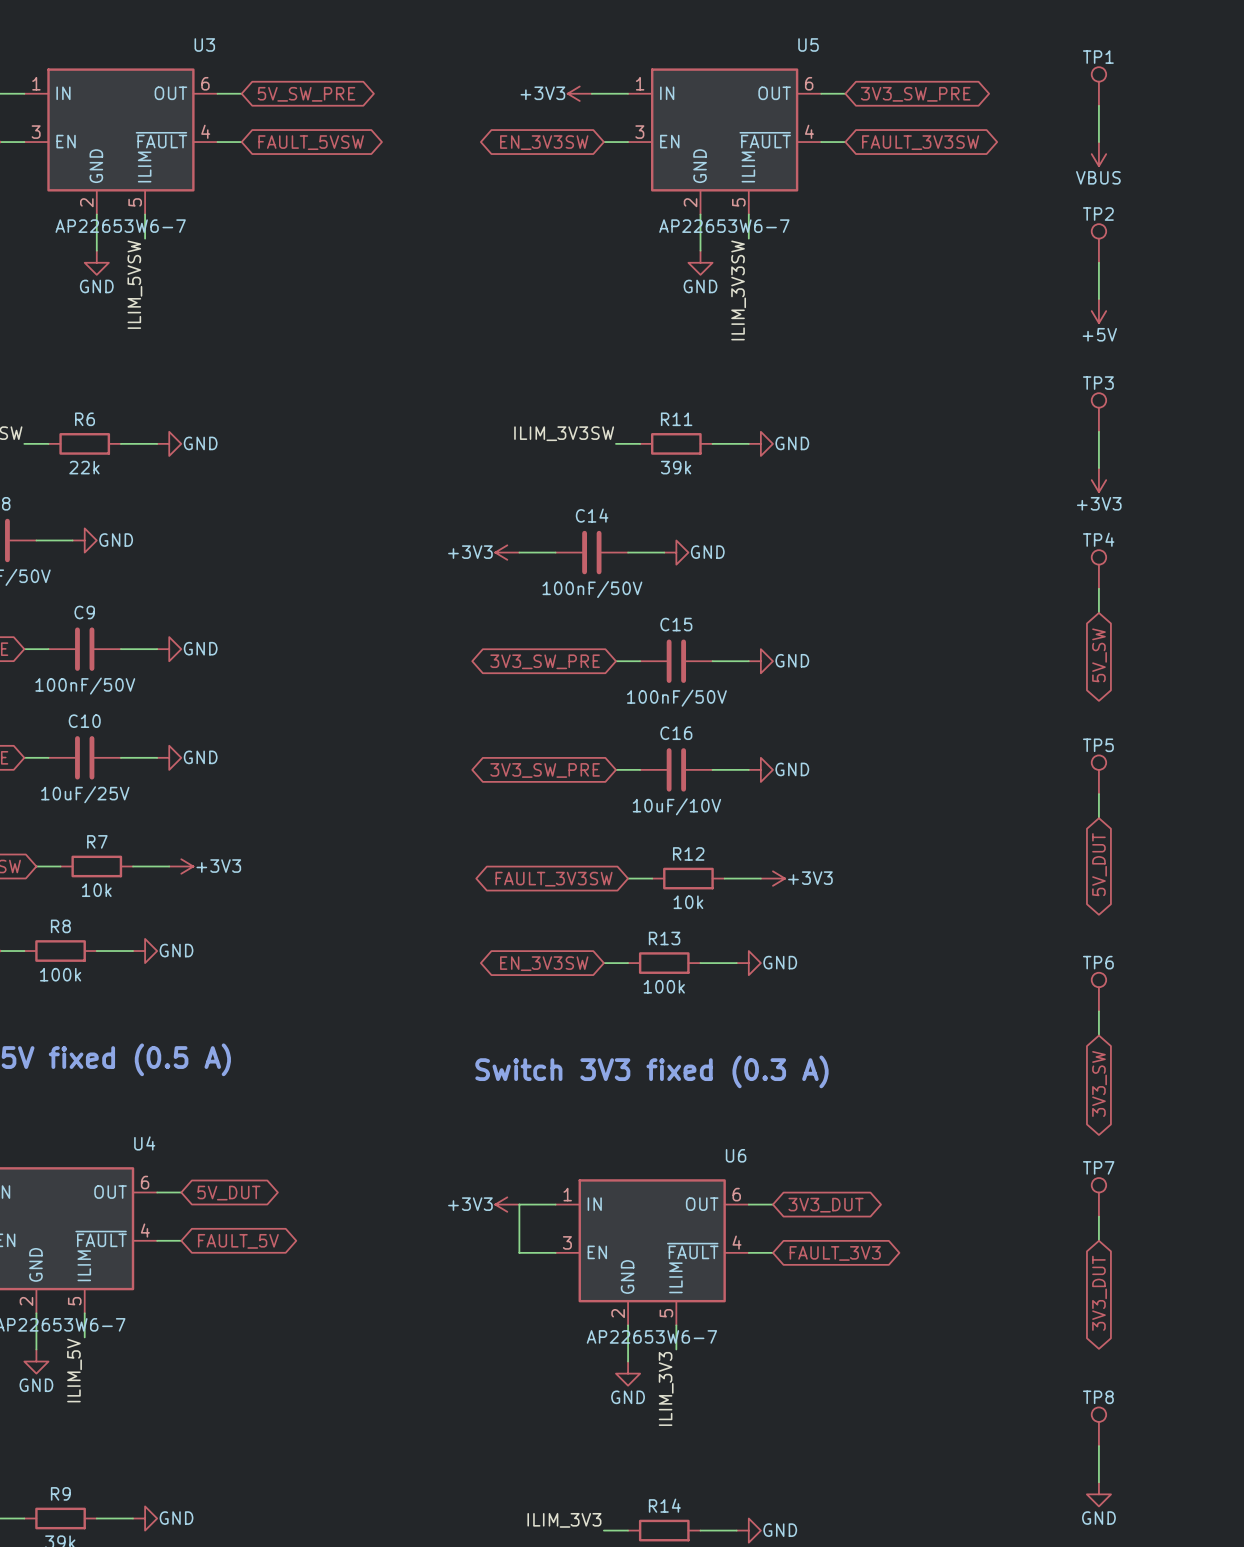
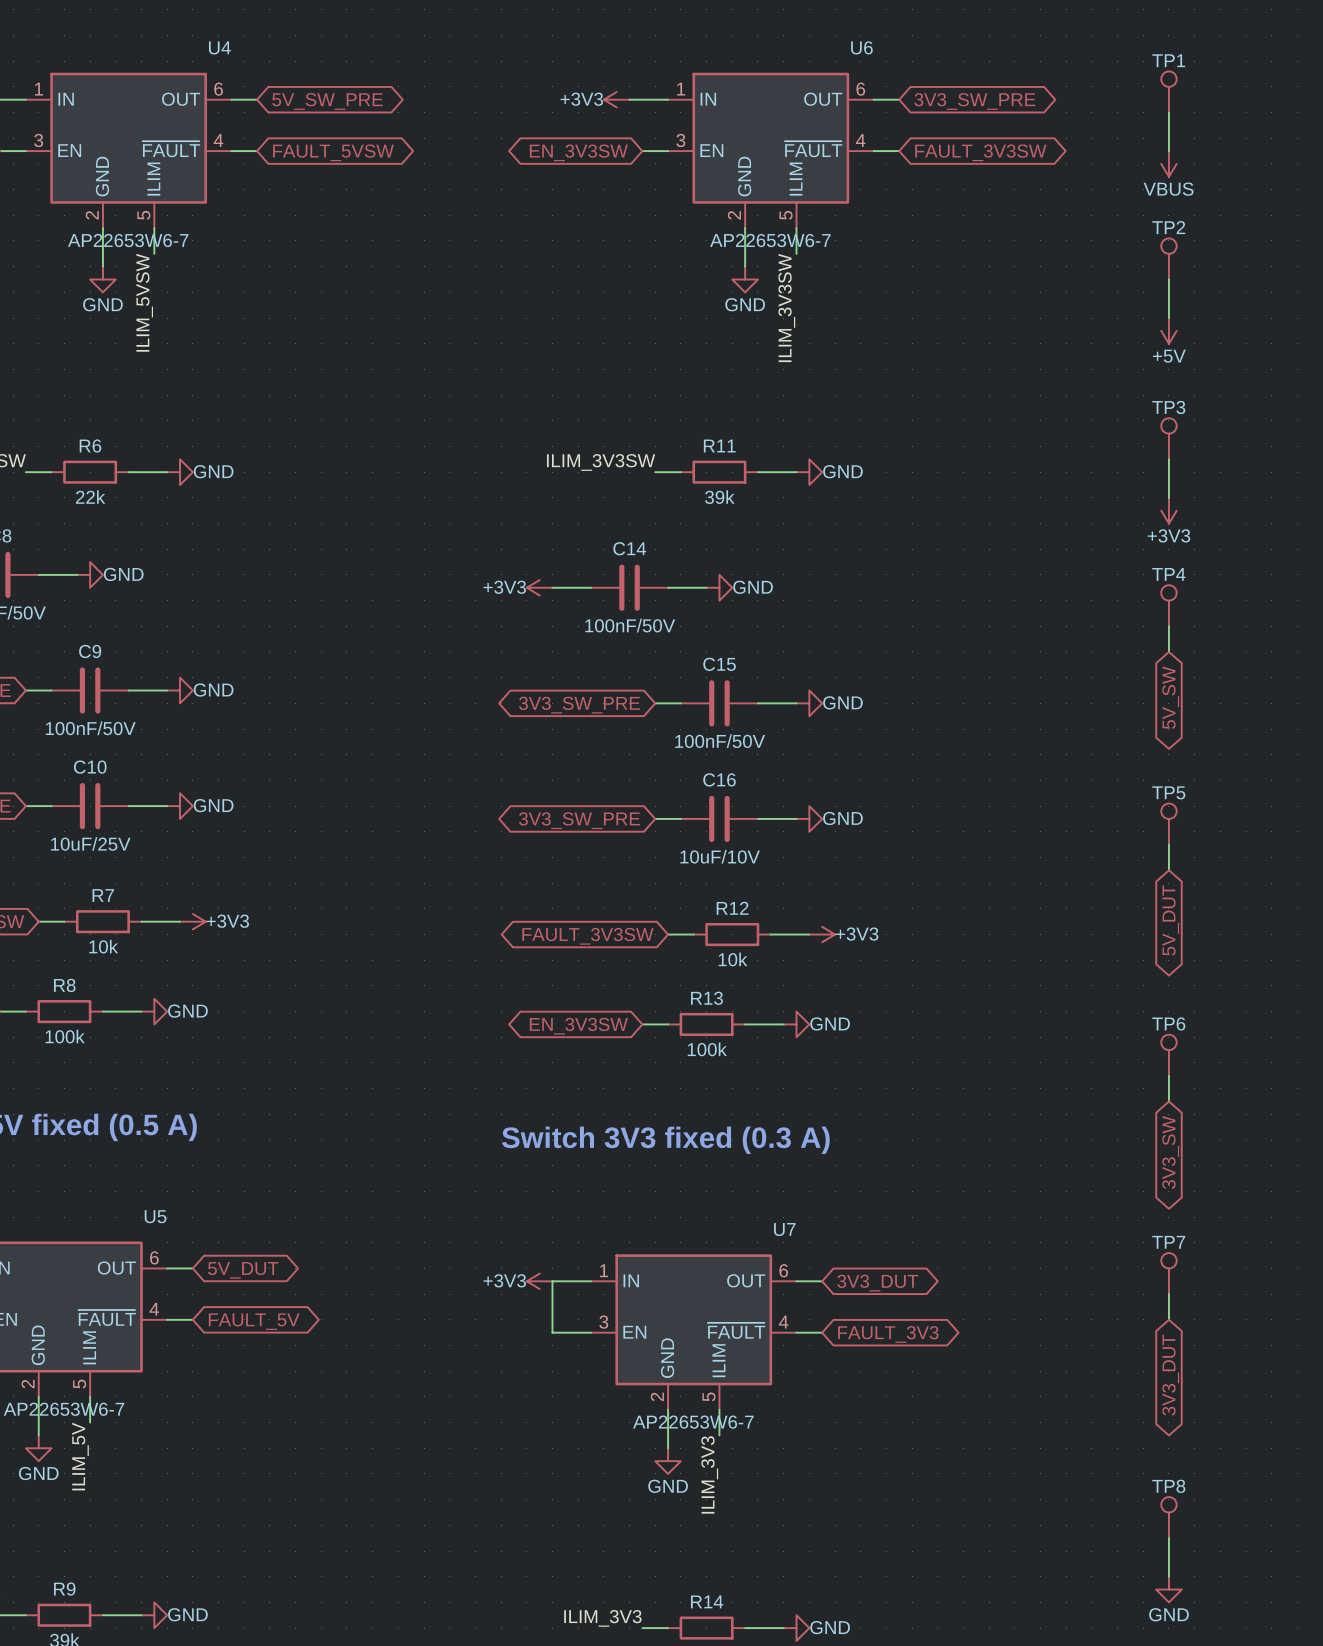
U3 name: U3 (204, 44) -> U4 (219, 47)
U5 name: U5 (808, 44) -> U6 (861, 47)
U4 name: U4 (144, 1143) -> U5 (155, 1216)
U6 name: U6 (736, 1155) -> U7 (784, 1229)

